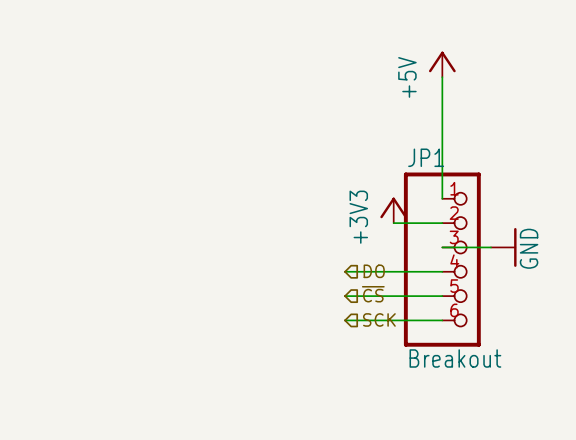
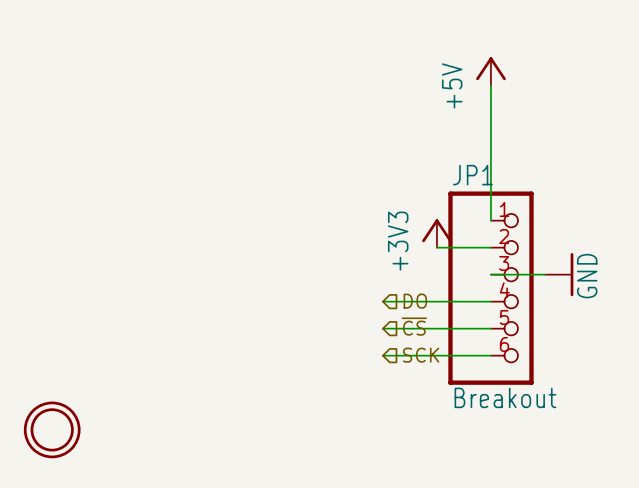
part: none -> (52, 429)

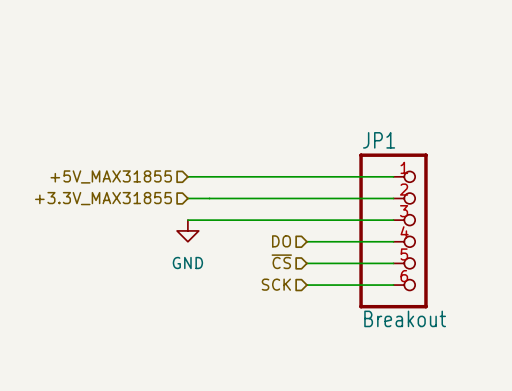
power symbol: +5V (490, 71) -> none
wire: (490, 85) (490, 220) -> (187, 176) (393, 176)
hierarchical label: none -> +5V_MAX31855 (111, 176)
power symbol: +3V3 (436, 233) -> none
hierarchical label: none -> +3.3V_MAX31855 (103, 198)
wire: none -> (187, 198) (350, 198)
wire: (490, 274) (544, 274) -> (393, 220) (187, 220)
power symbol: GND (559, 274) -> none
power symbol: none -> GND (187, 230)
hierarchical label rotation: 0° (415, 301) -> 180° (281, 241)
hierarchical label position: DO (415, 301) -> DO (281, 241)
hierarchical label rotation: 0° (414, 326) -> 180° (281, 261)
hierarchical label position: ~{CS} (414, 326) -> ~{CS} (281, 261)
hierarchical label rotation: 0° (421, 355) -> 180° (276, 284)
hierarchical label position: SCK (421, 355) -> SCK (276, 284)
part: (52, 429) -> none

